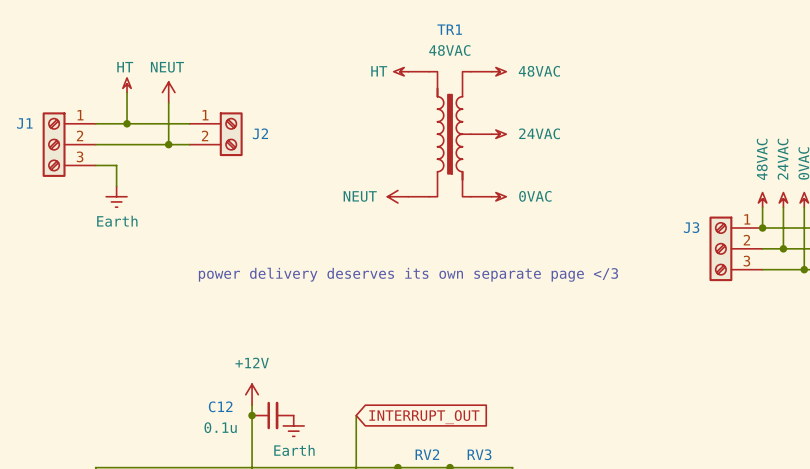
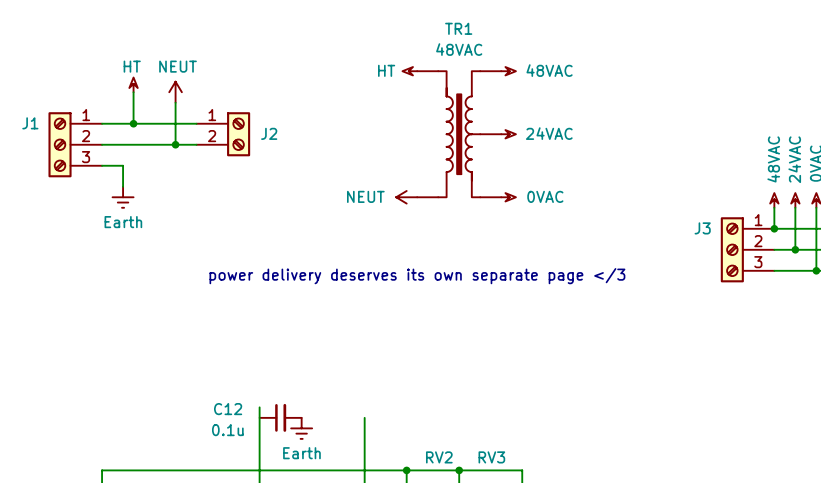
power symbol: +12V (252, 394) -> none
junction: (252, 415) -> none
global label: INTERRUPT_OUT (424, 417) -> none

